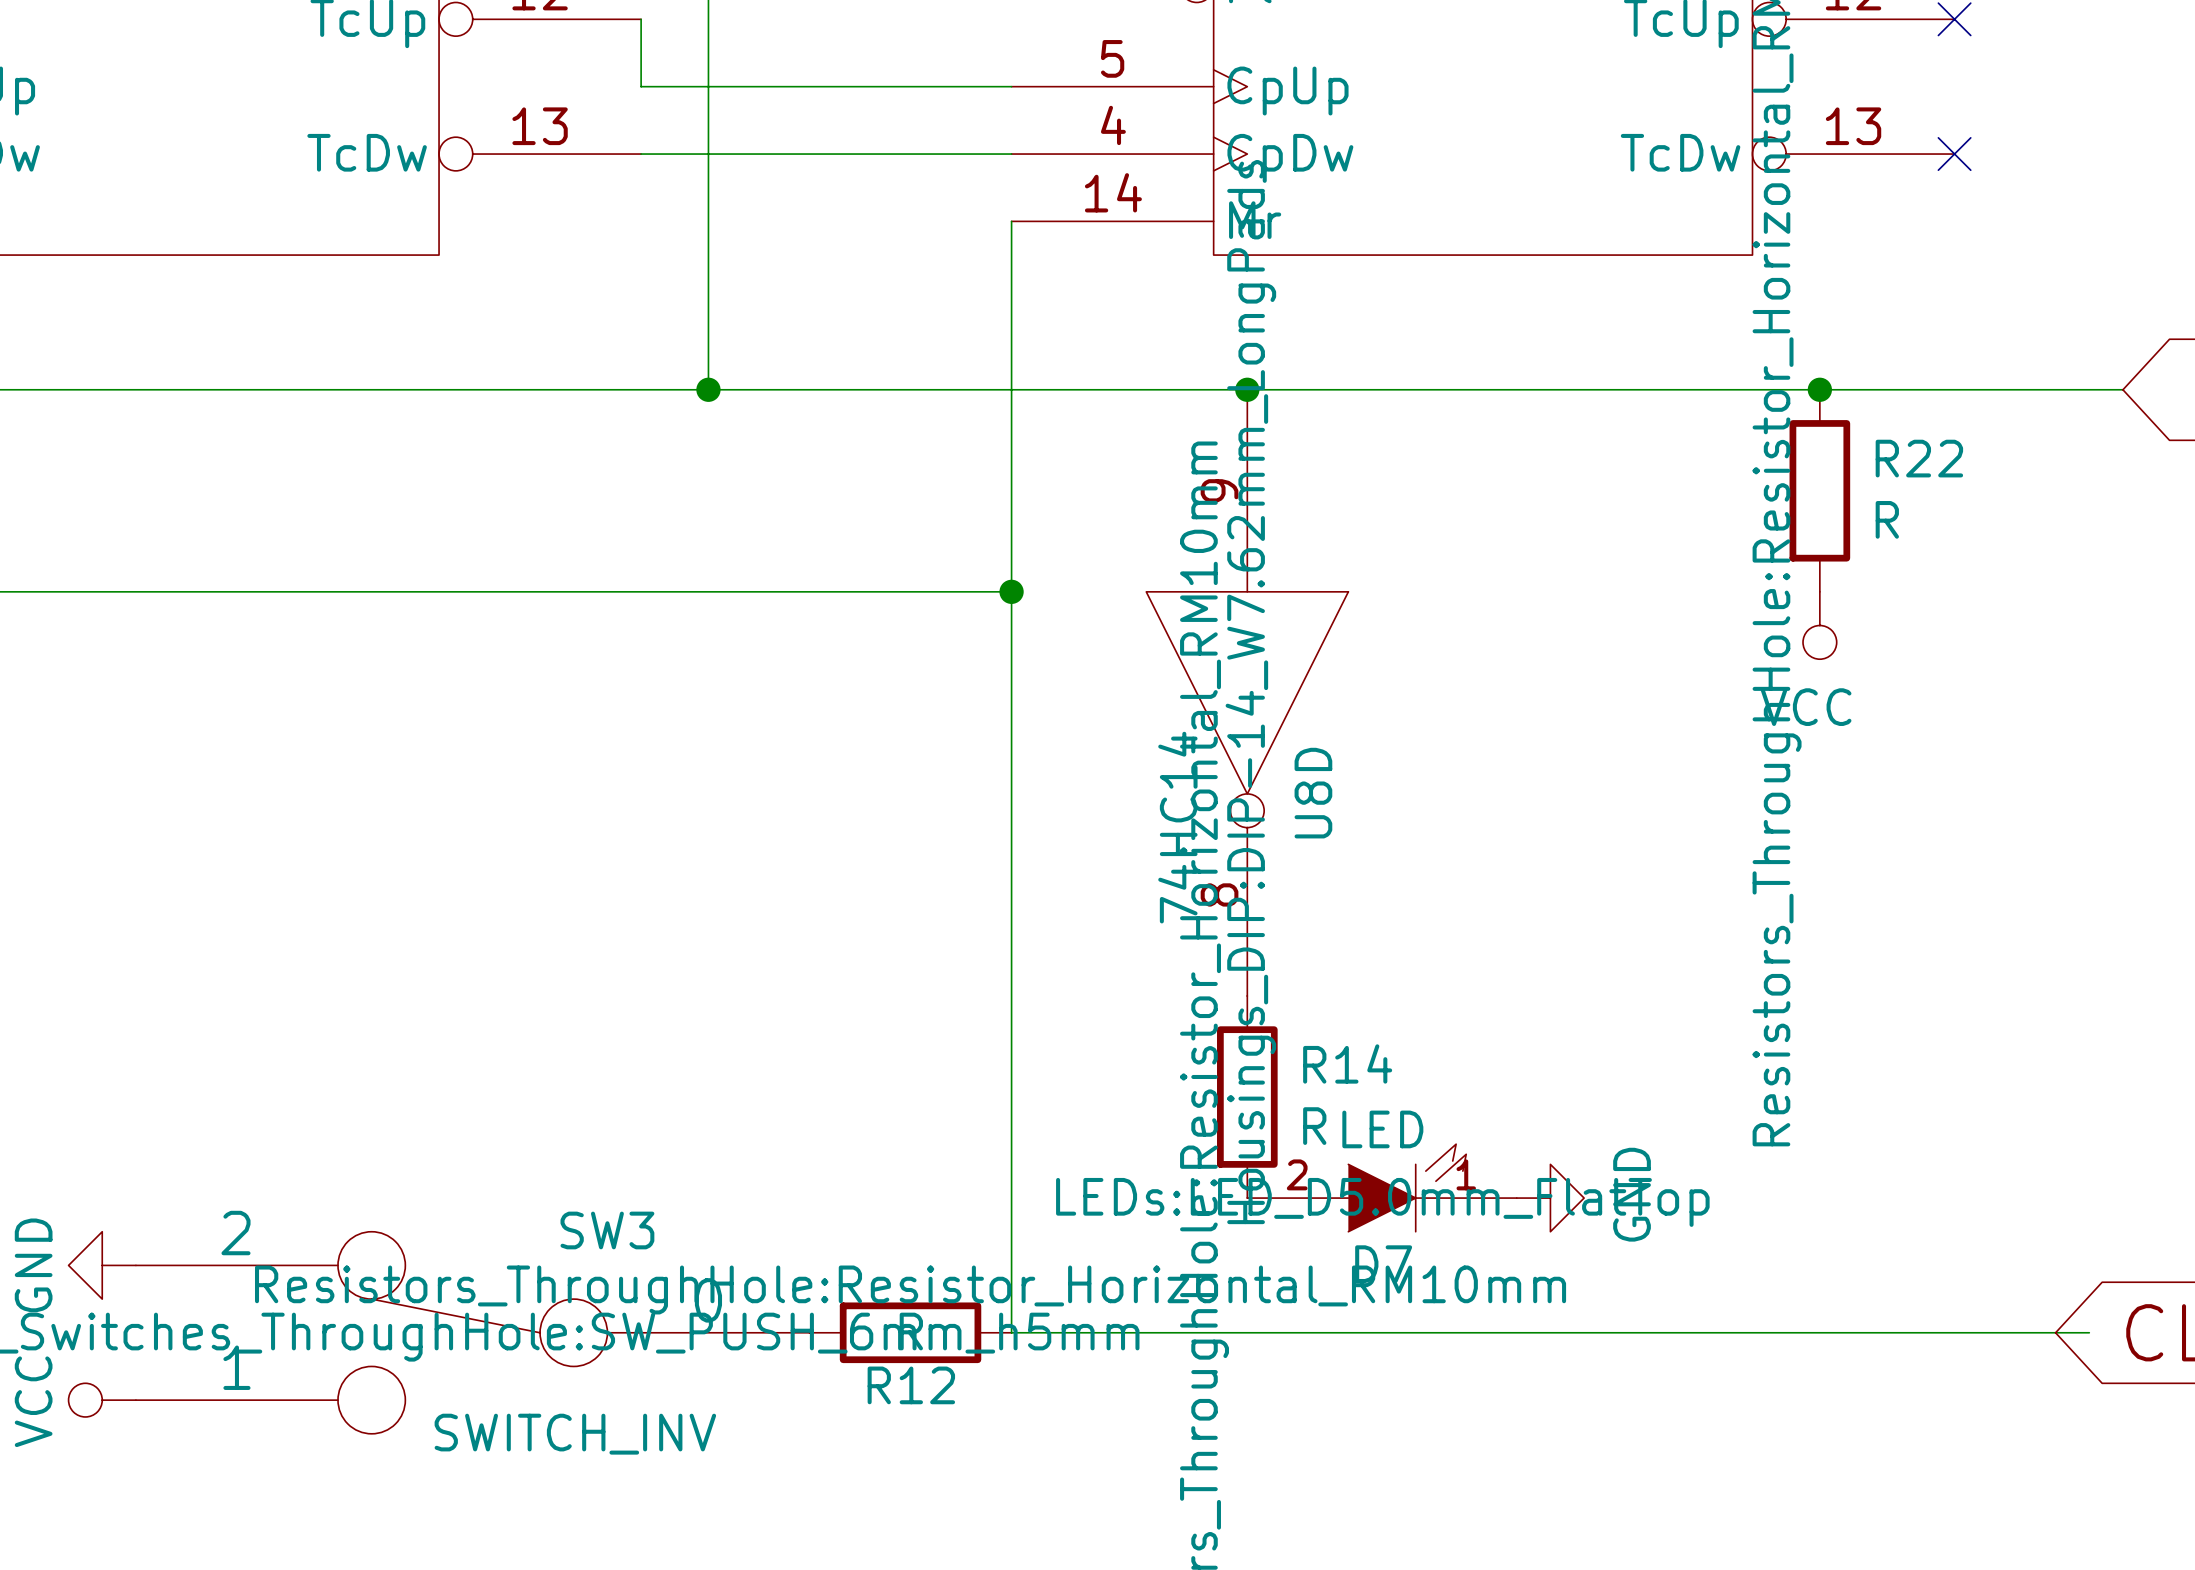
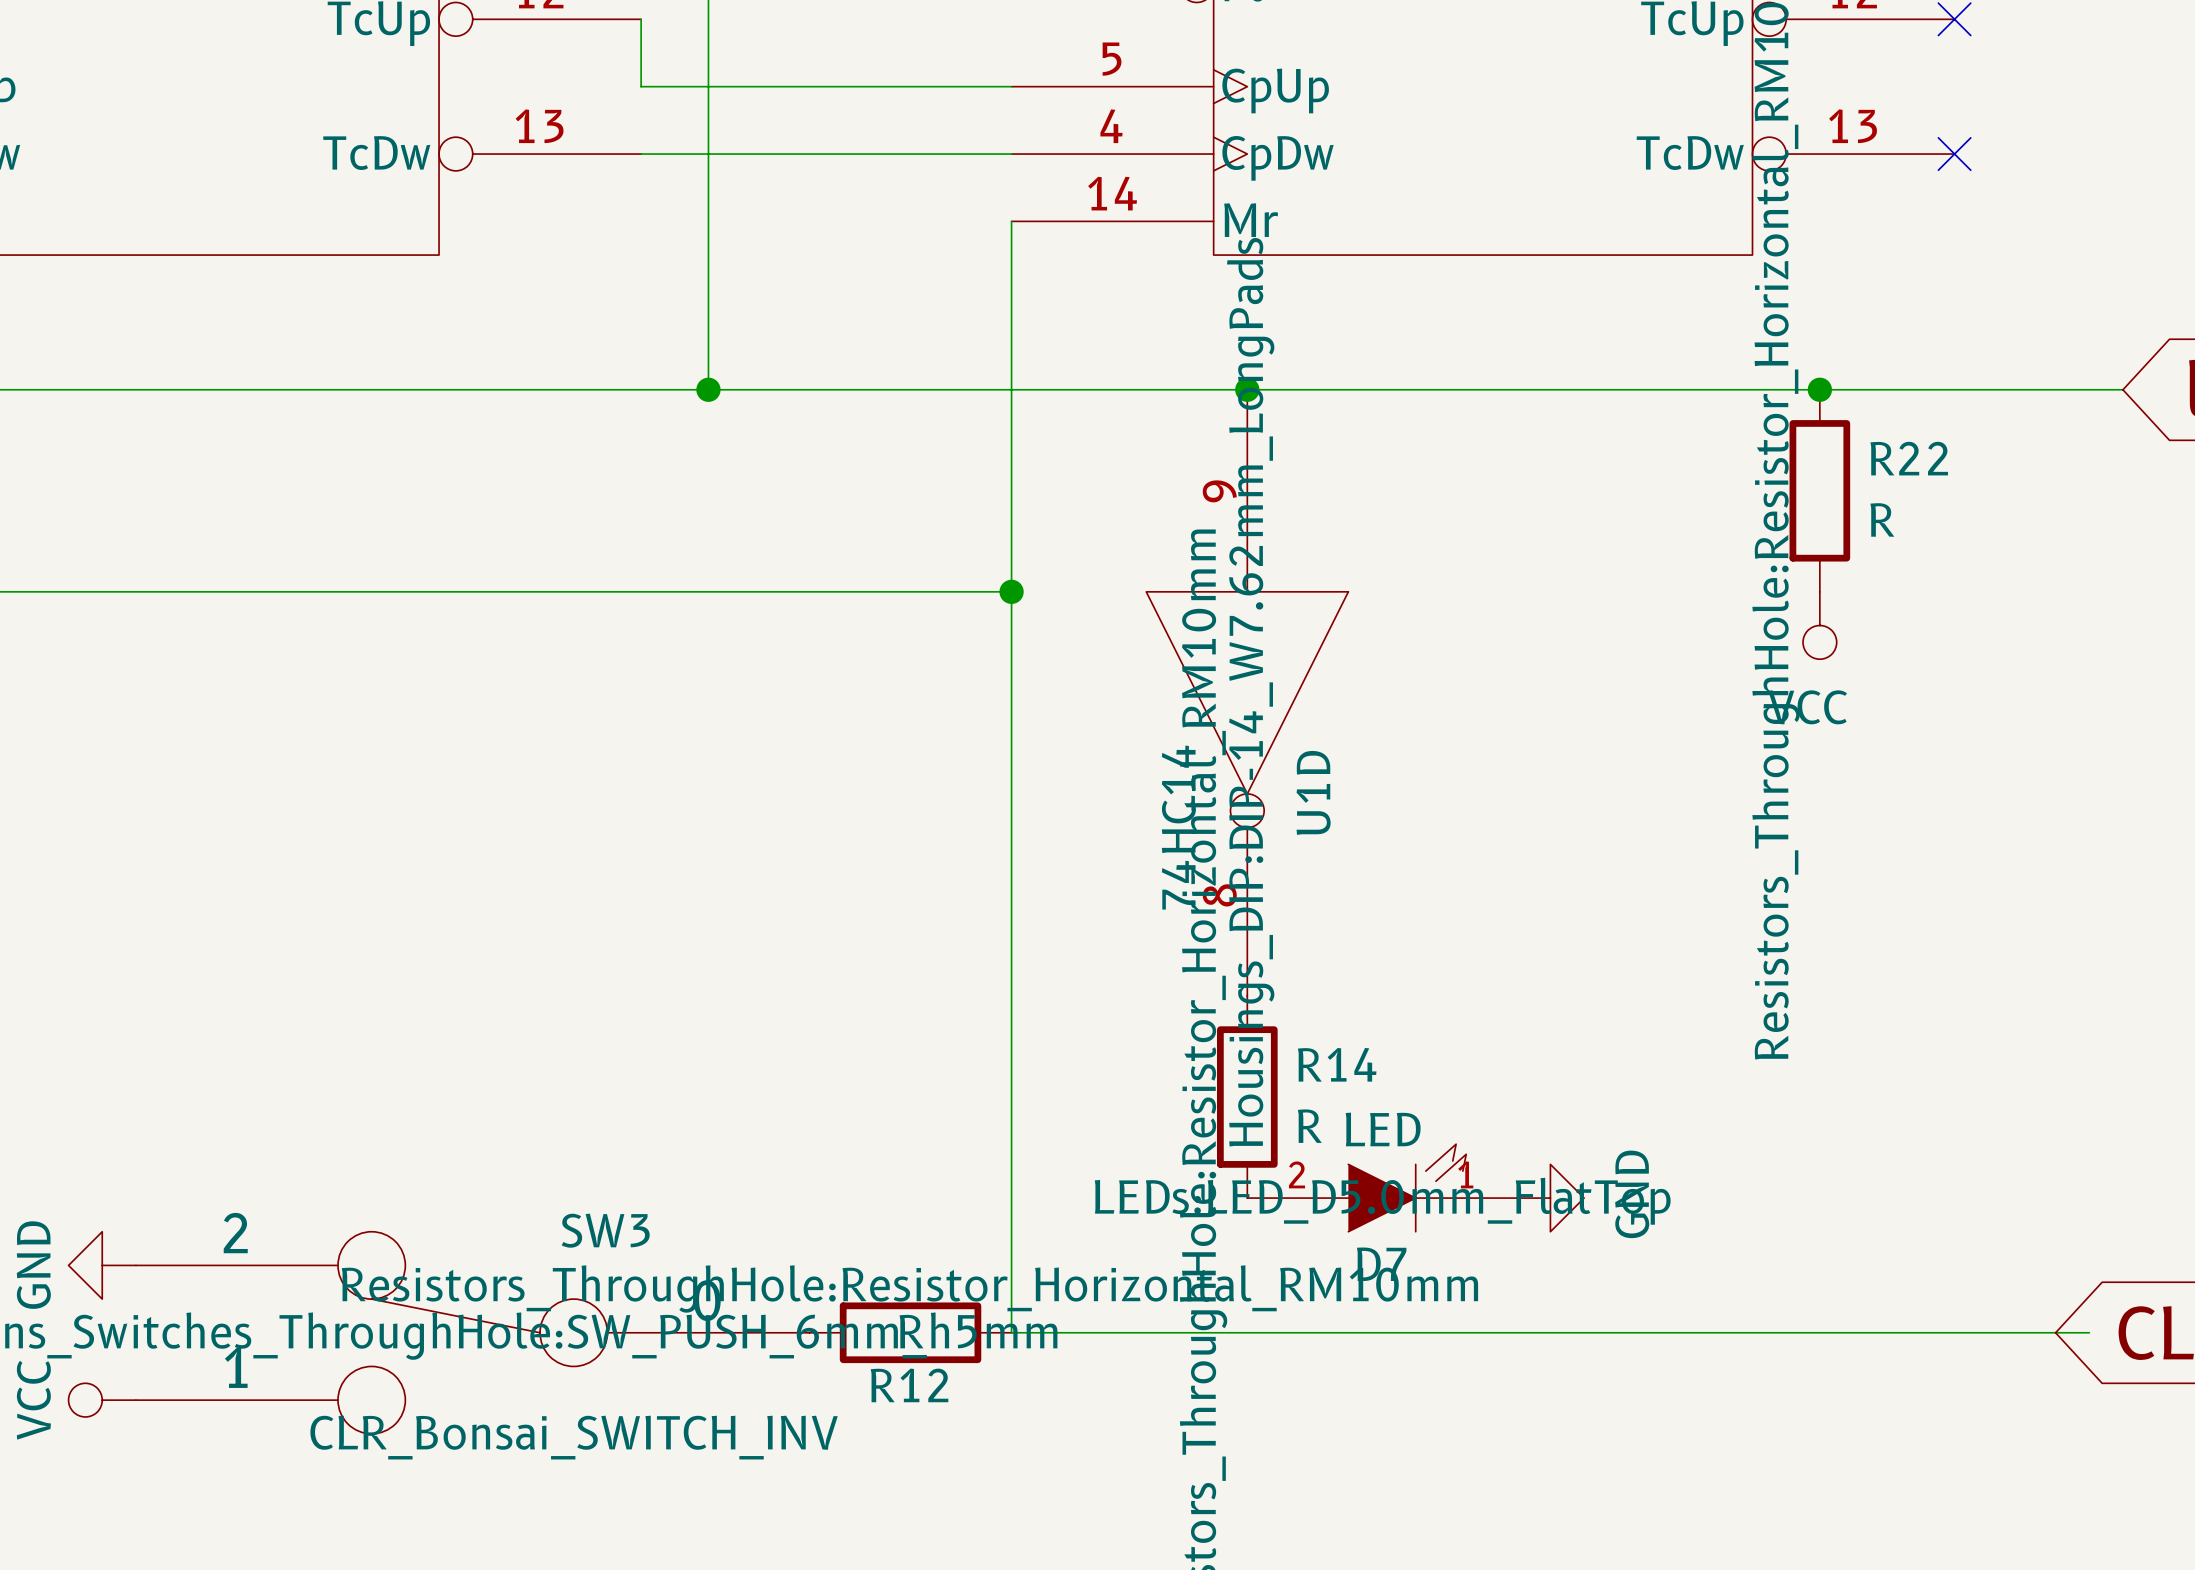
U8D name: U8D (1313, 793) -> U1D (1313, 792)
SW3 value: SWITCH_INV (575, 1434) -> CLR_Bonsai_SWITCH_INV (574, 1437)

